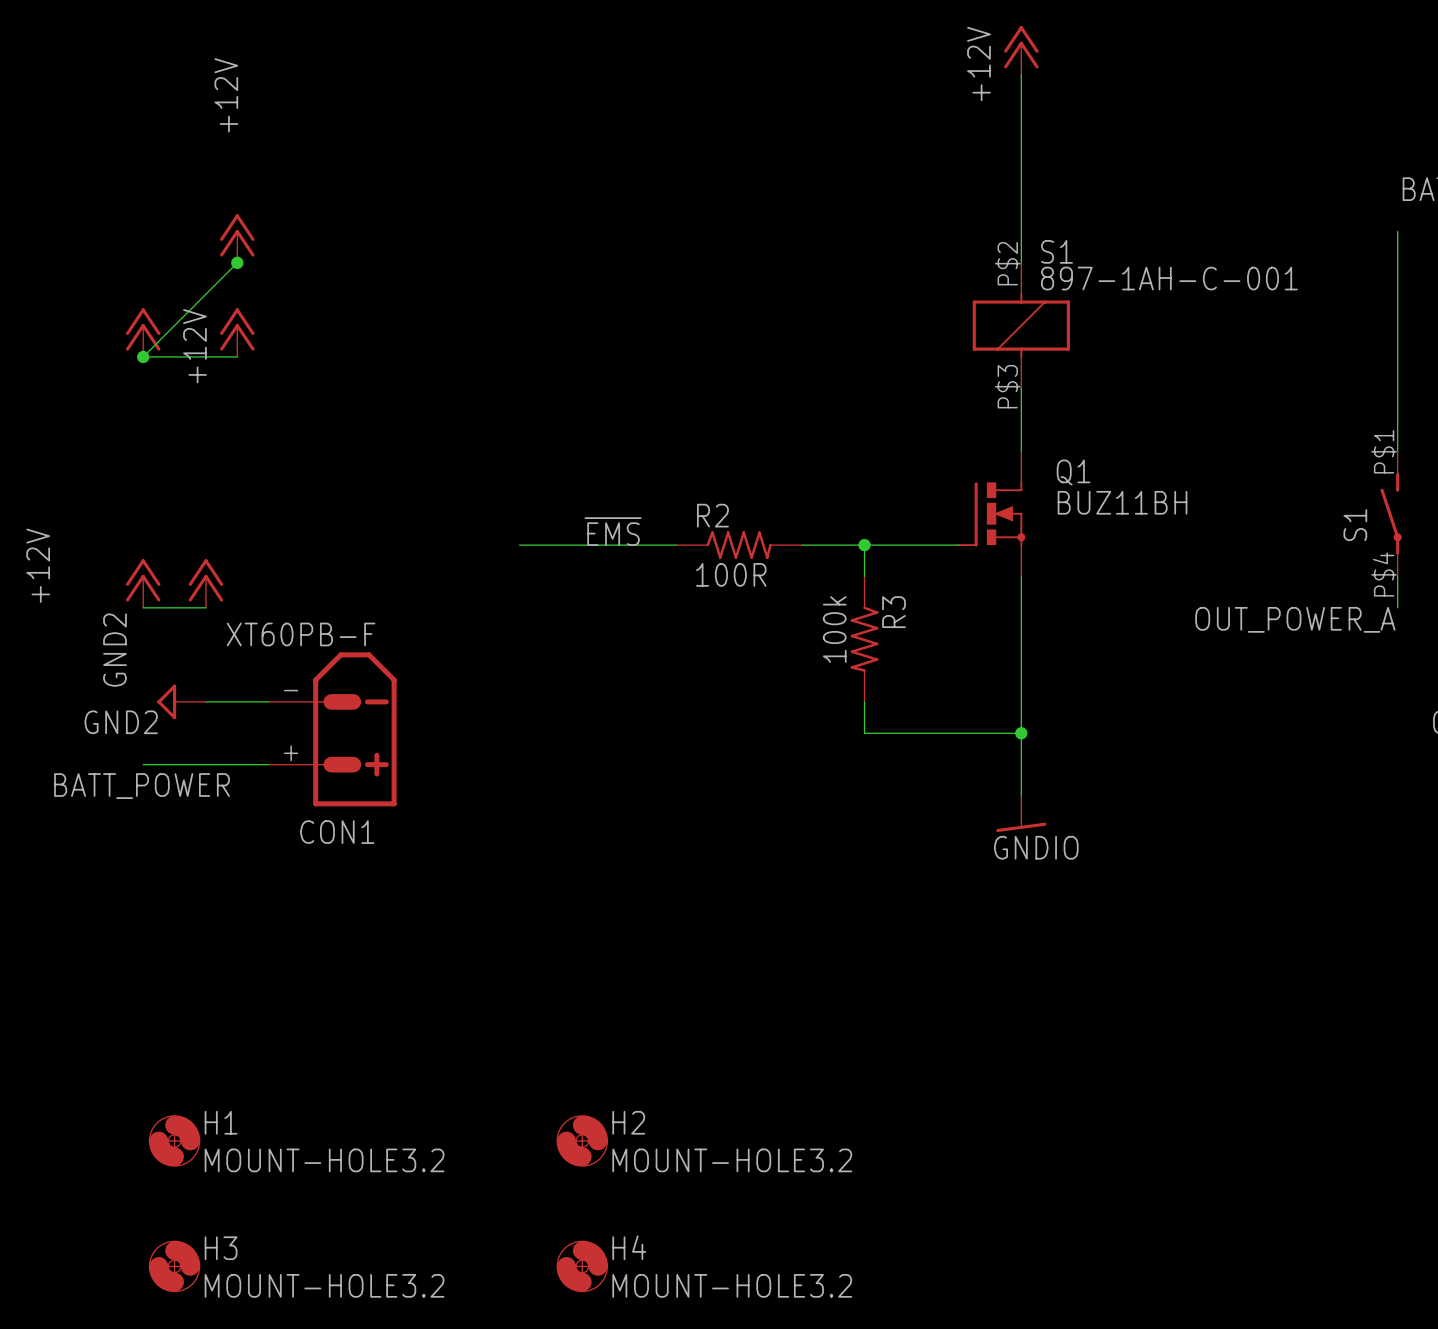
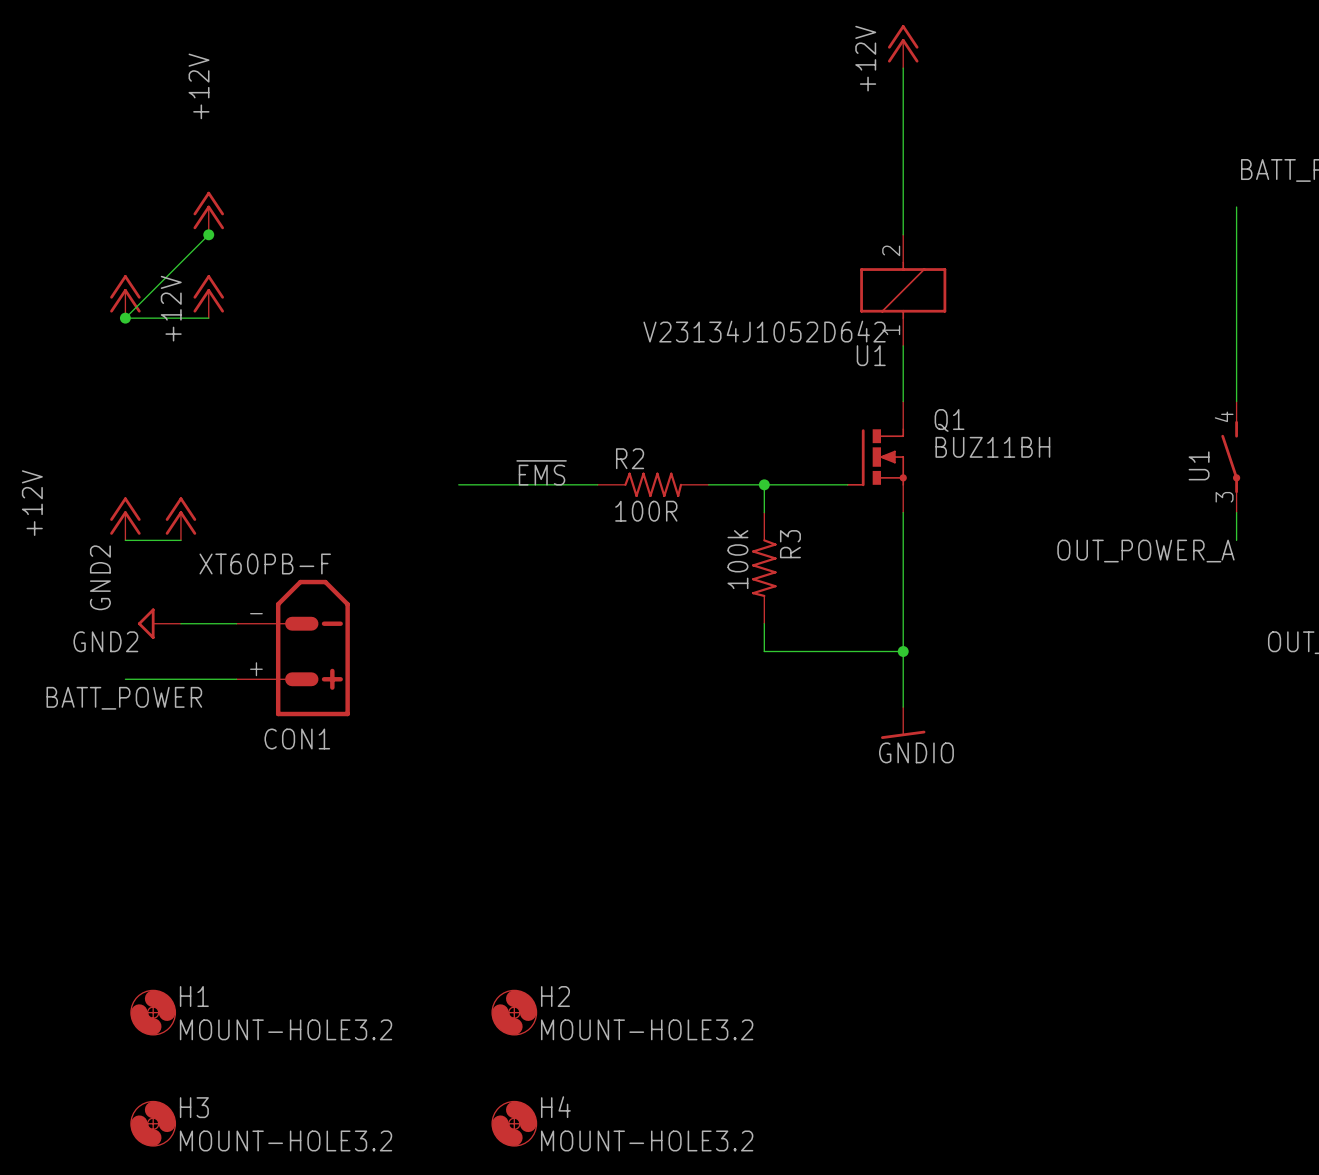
S1 name: S1 (1056, 251) -> U1 (871, 355)
S1 pin number: P$2 (1007, 263) -> 2 (891, 250)
S1 value: 897-1AH-C-001 (1169, 278) -> V23134J1052D642 (764, 331)
S1 pin number: P$3 (1007, 386) -> 1 (891, 330)
S1 pin number: P$1 (1384, 451) -> 4 (1224, 416)
S1 name: S1 (1355, 525) -> U1 (1199, 465)
S1 pin number: P$4 (1384, 574) -> 3 (1224, 497)

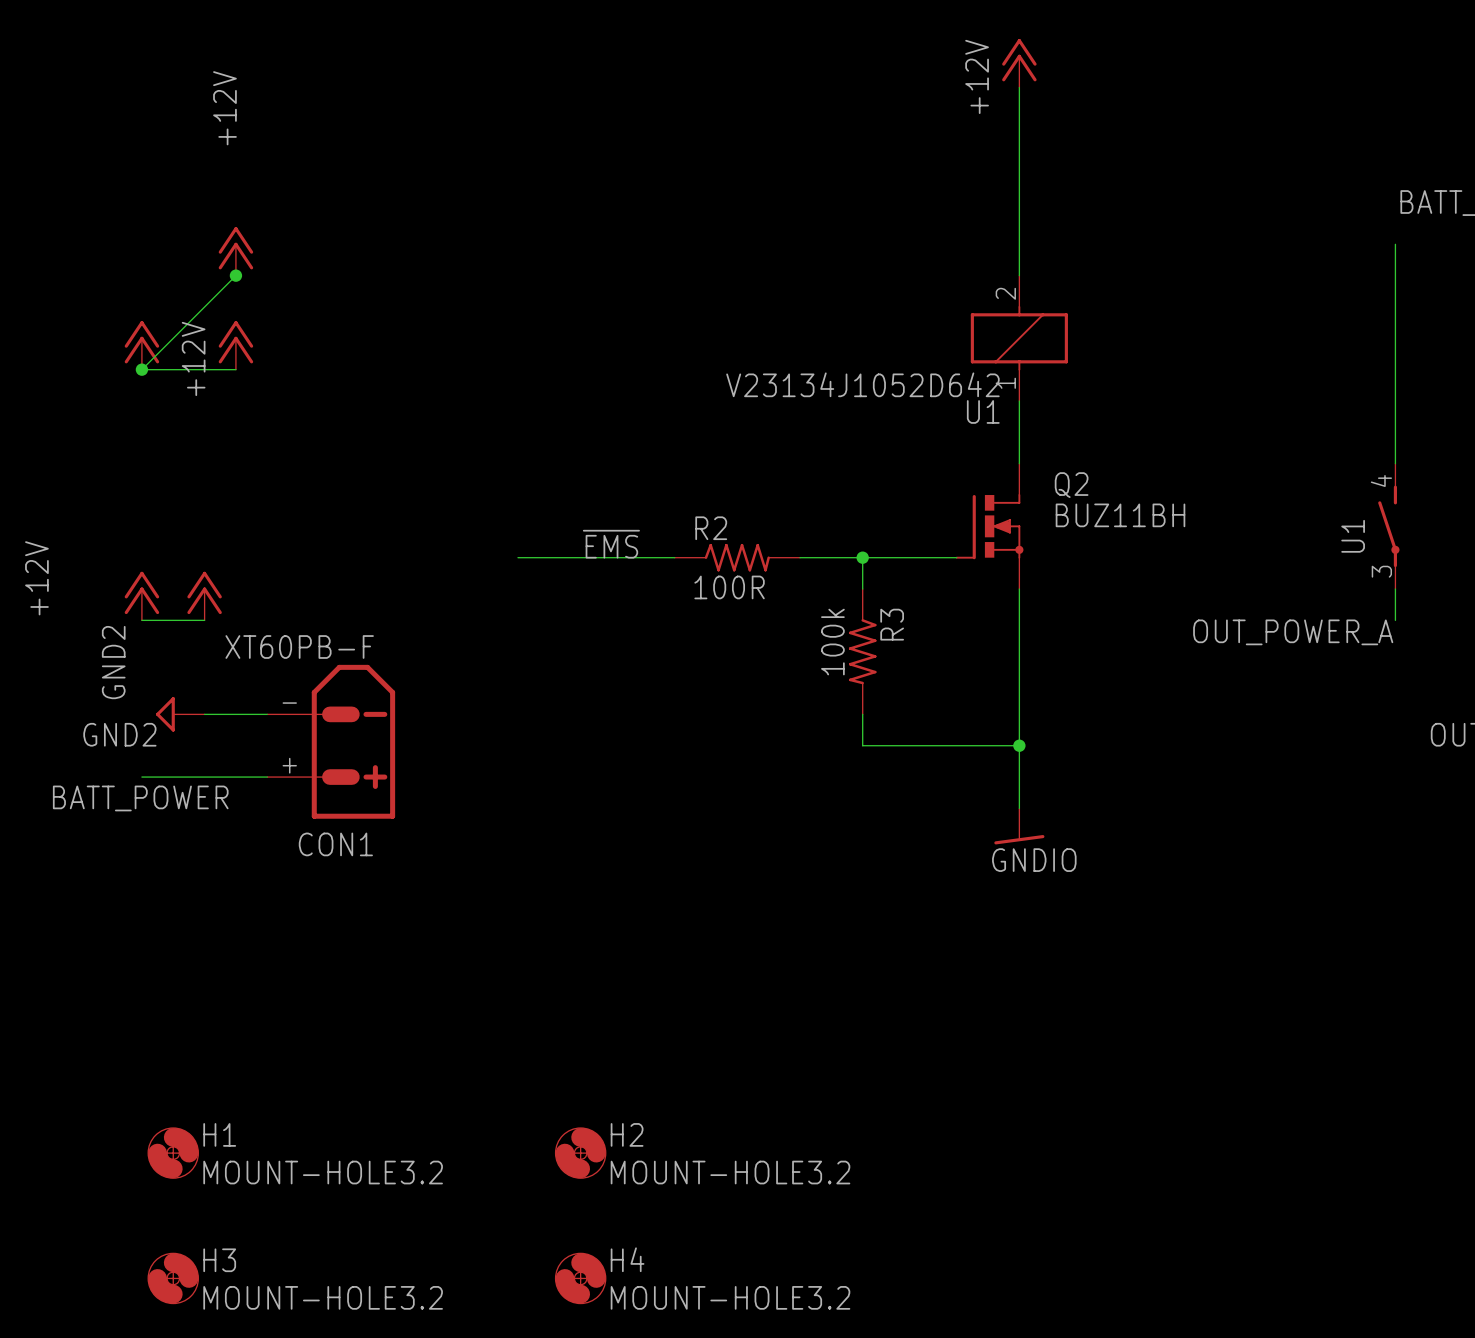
Q1 name: Q1 (949, 420) -> Q2 (1071, 485)

